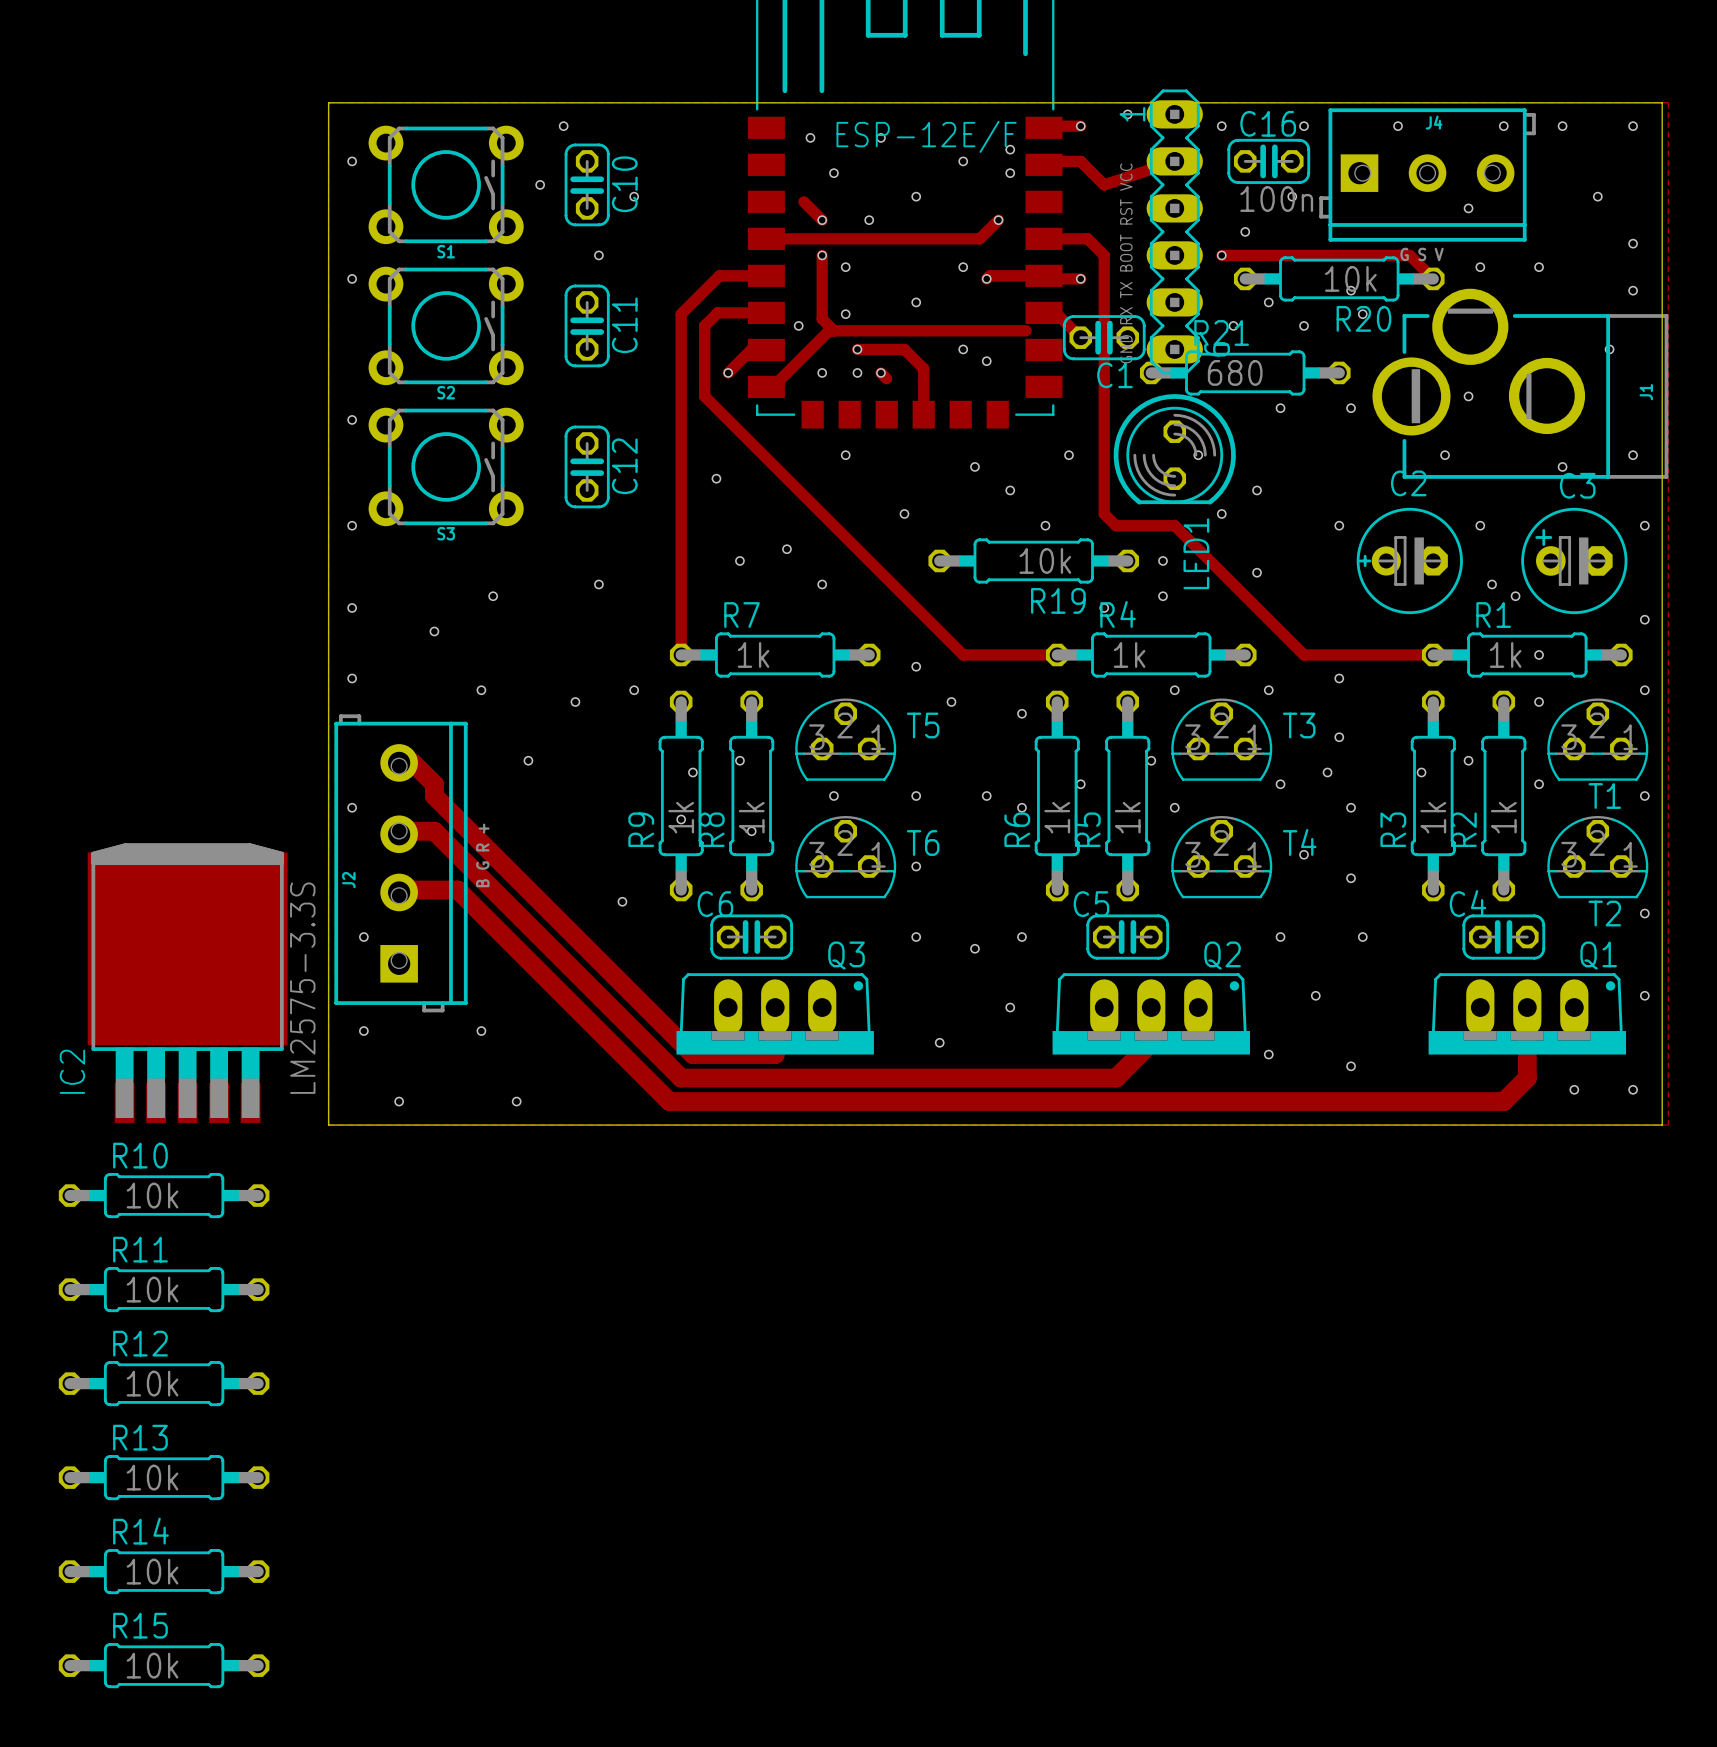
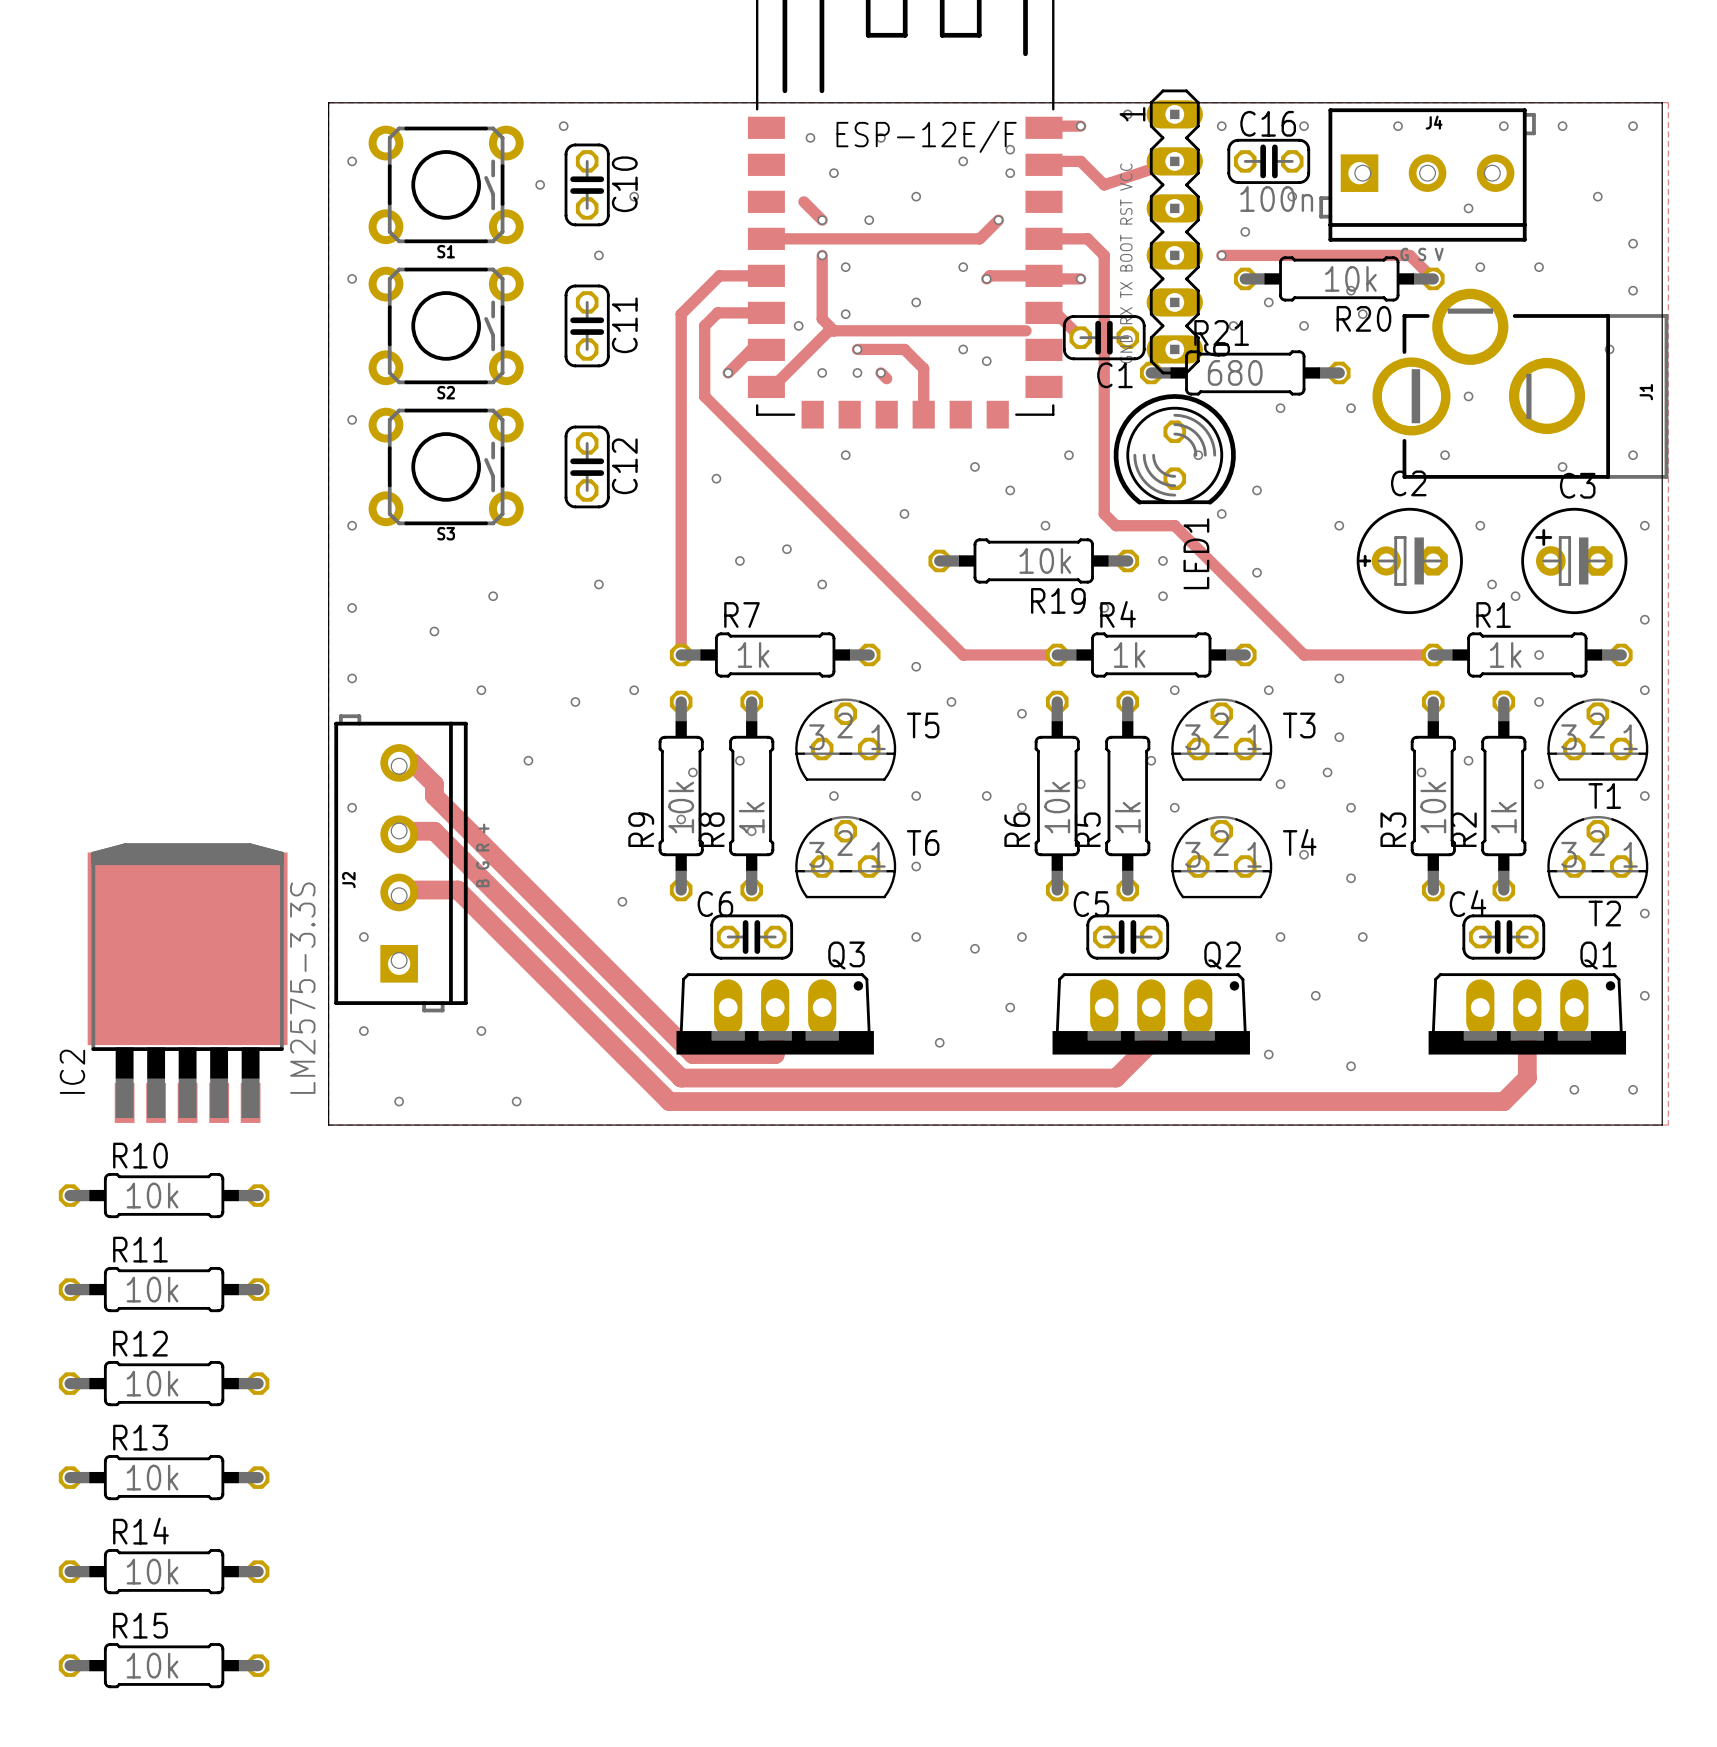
R9 value: 1k (681, 817) -> 10k (681, 807)
R6 value: 1k (1057, 817) -> 10k (1057, 807)
R3 value: 1k (1433, 817) -> 10k (1433, 807)

